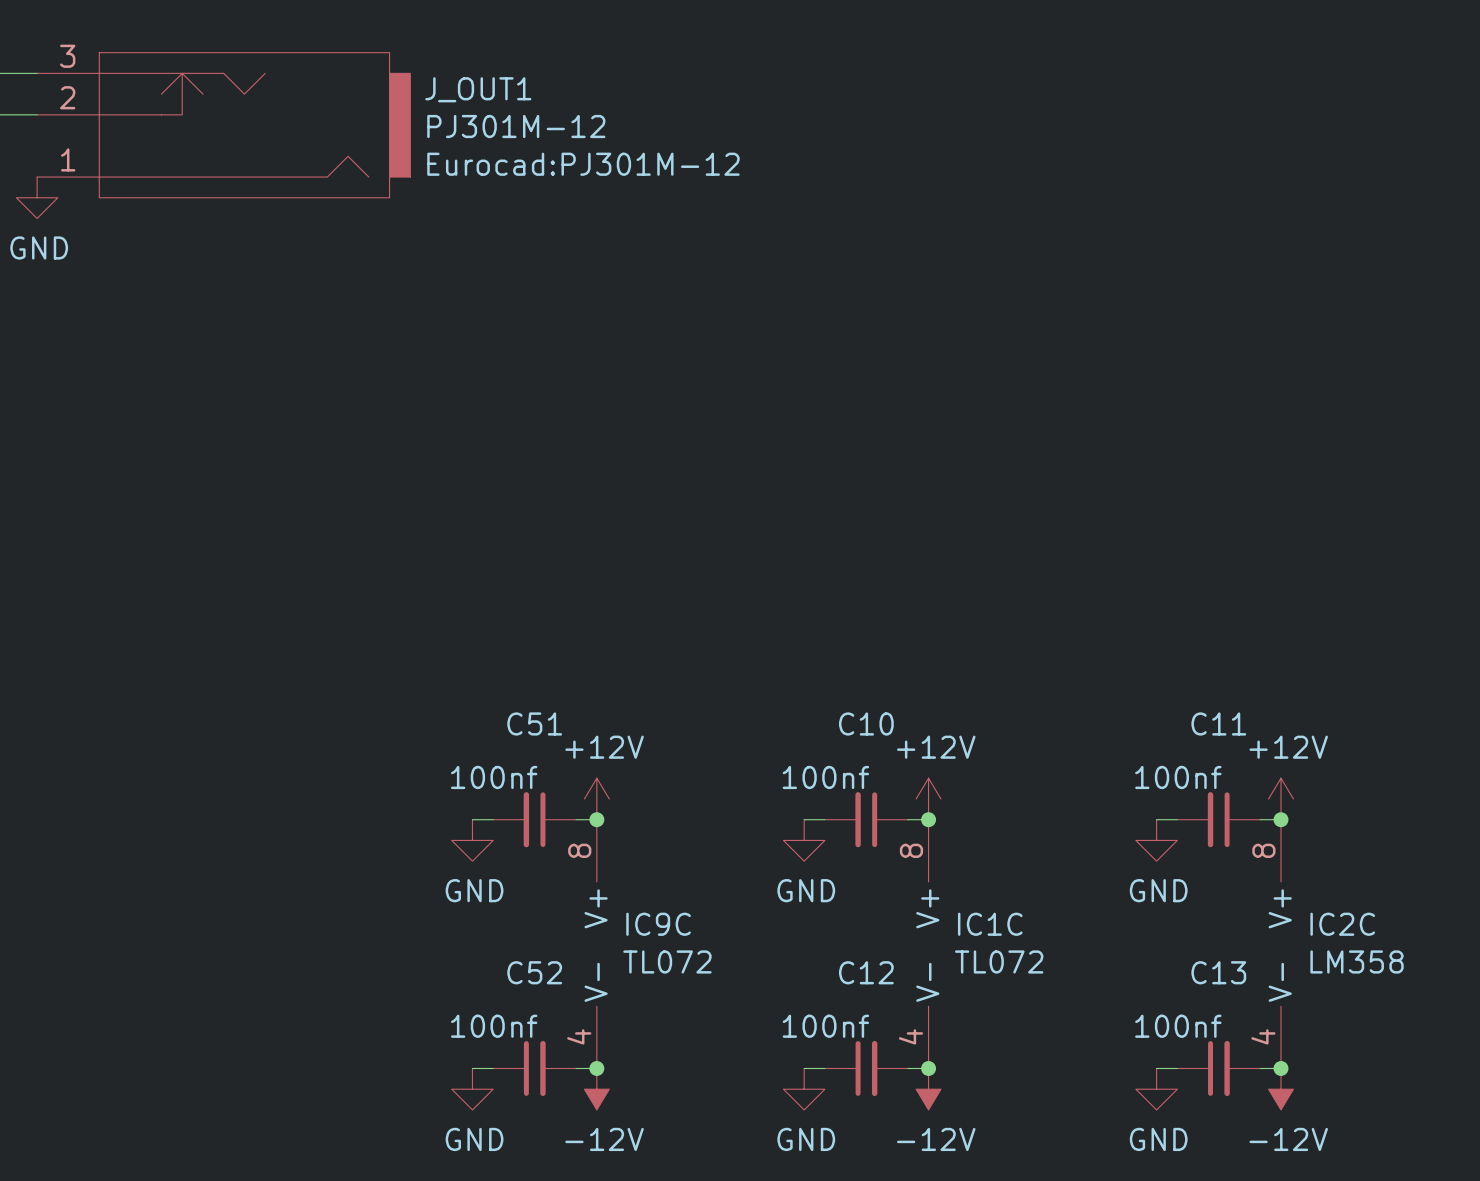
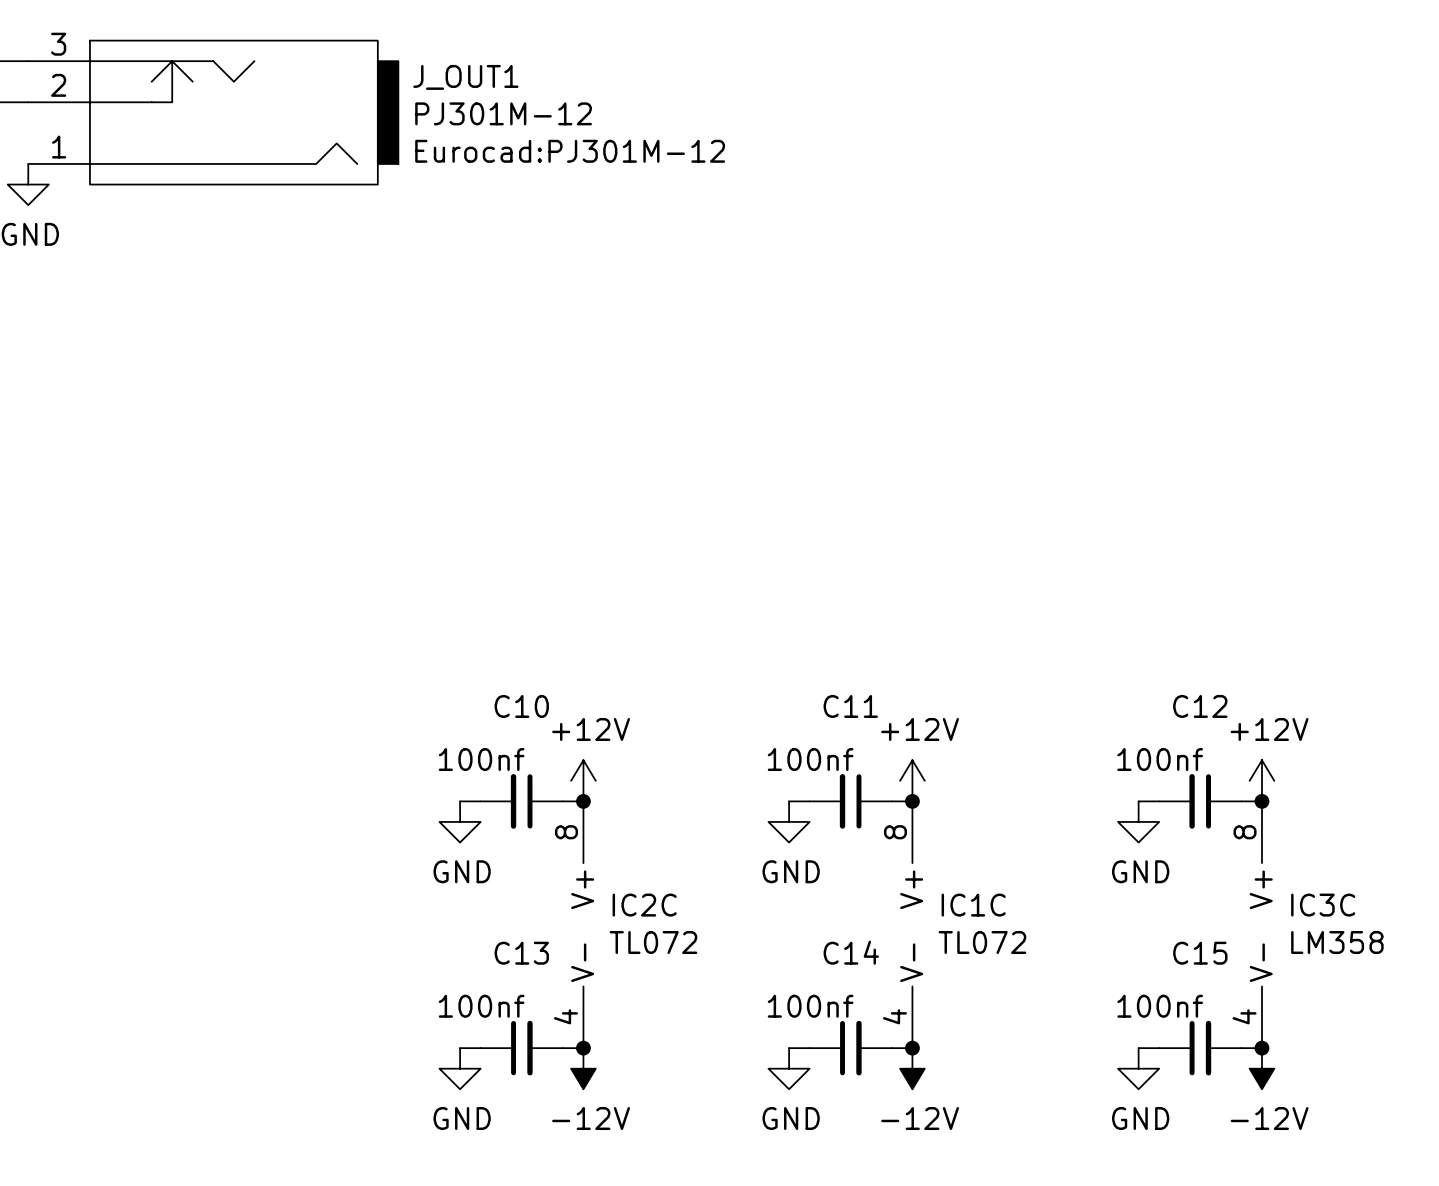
C51 name: C51 (534, 723) -> C10 (521, 706)
C10 name: C10 (866, 723) -> C11 (850, 706)
C11 name: C11 (1218, 723) -> C12 (1200, 706)
IC9C name: IC9C (658, 924) -> IC2C (644, 905)
IC2C name: IC2C (1342, 924) -> IC3C (1323, 905)
C52 name: C52 (534, 972) -> C13 (521, 953)
C12 name: C12 (866, 972) -> C14 (851, 952)
C13 name: C13 (1218, 972) -> C15 (1200, 953)

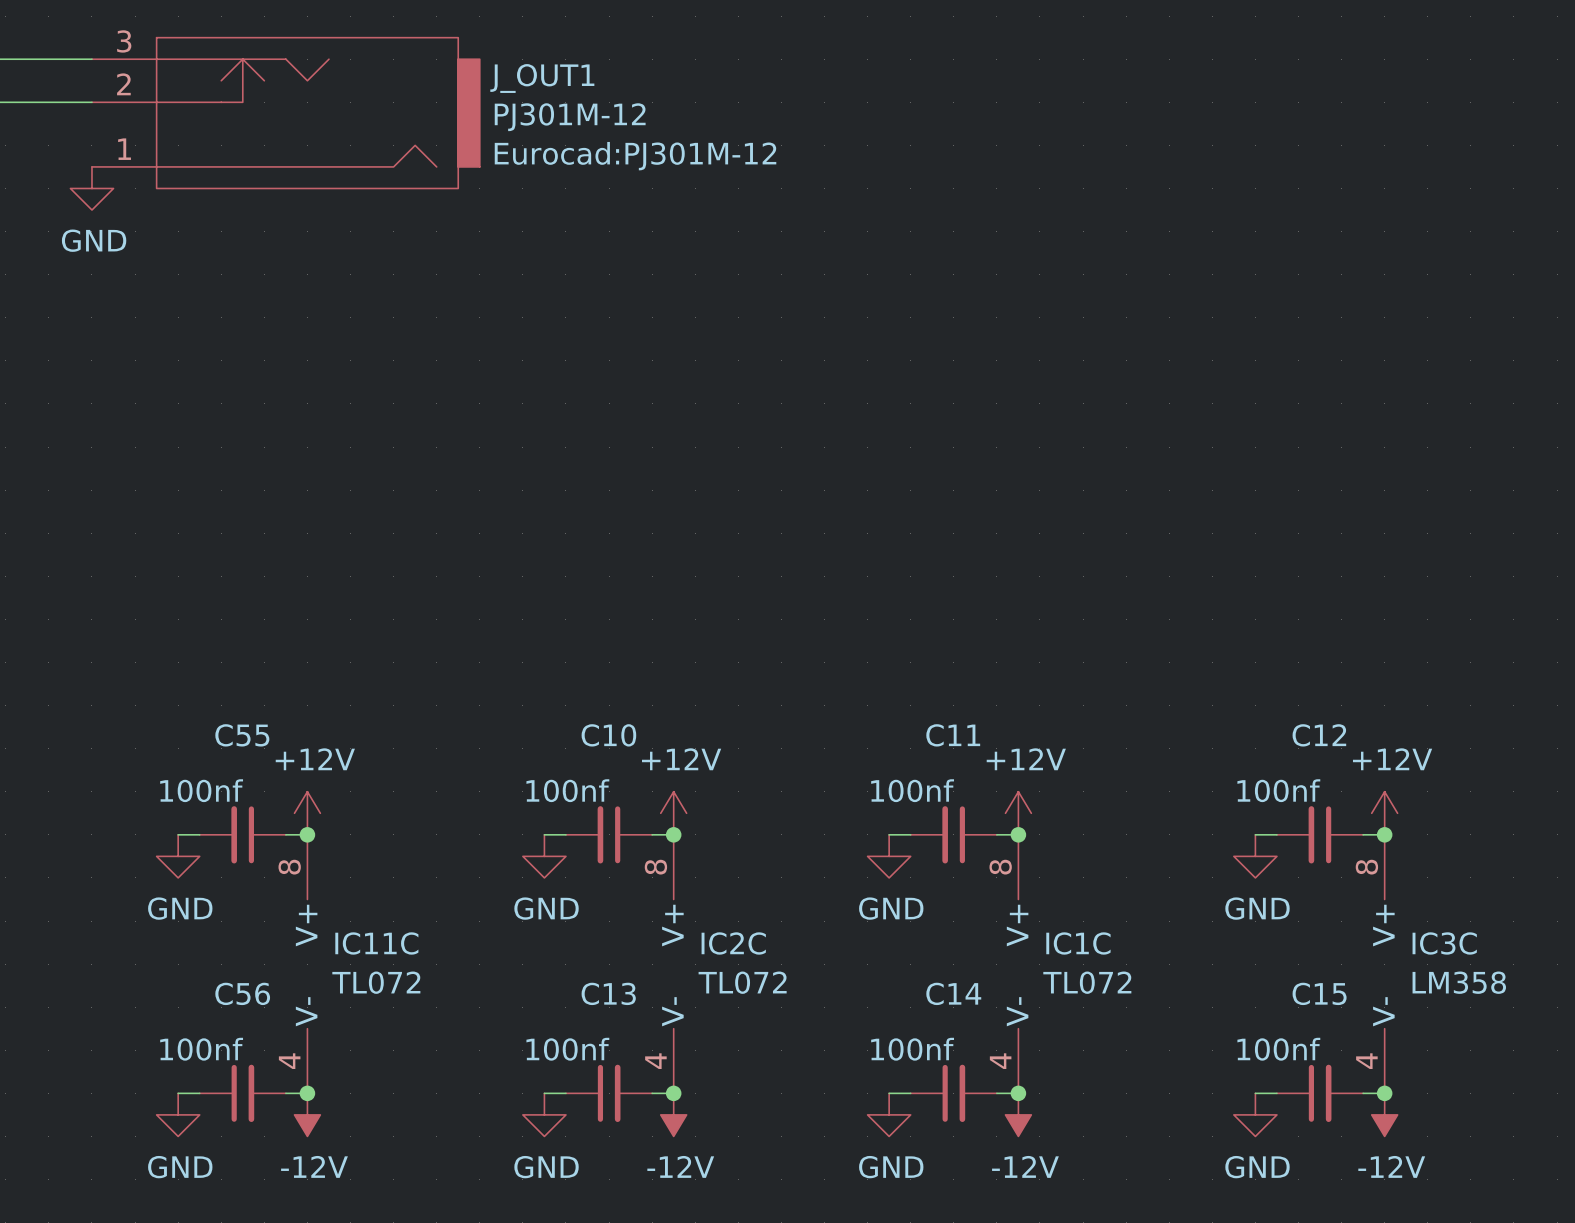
power symbol: none -> +12V (307, 813)
wire: none -> (178, 834) (199, 834)
C55: none -> 100nf (242, 834)
wire: none -> (285, 834) (307, 834)
junction: none -> (307, 834)
power symbol: none -> GND (178, 856)
IC11C: none -> TL072 (307, 964)
wire: none -> (178, 1093) (199, 1093)
C56: none -> 100nf (242, 1093)
wire: none -> (285, 1093) (307, 1093)
junction: none -> (307, 1093)
power symbol: none -> GND (178, 1114)
power symbol: none -> -12V (307, 1114)

